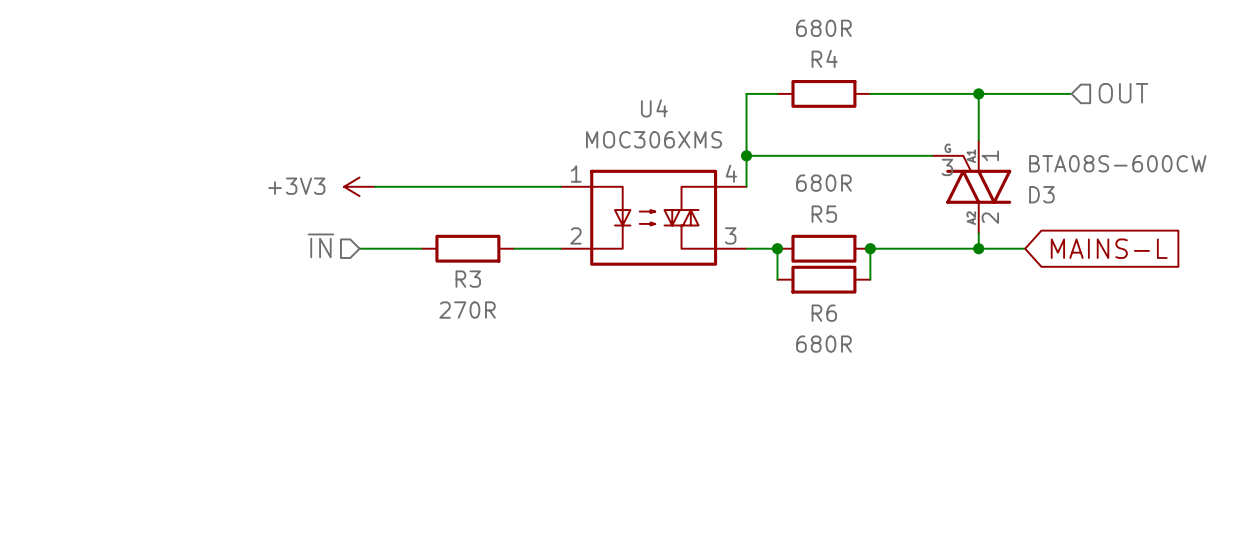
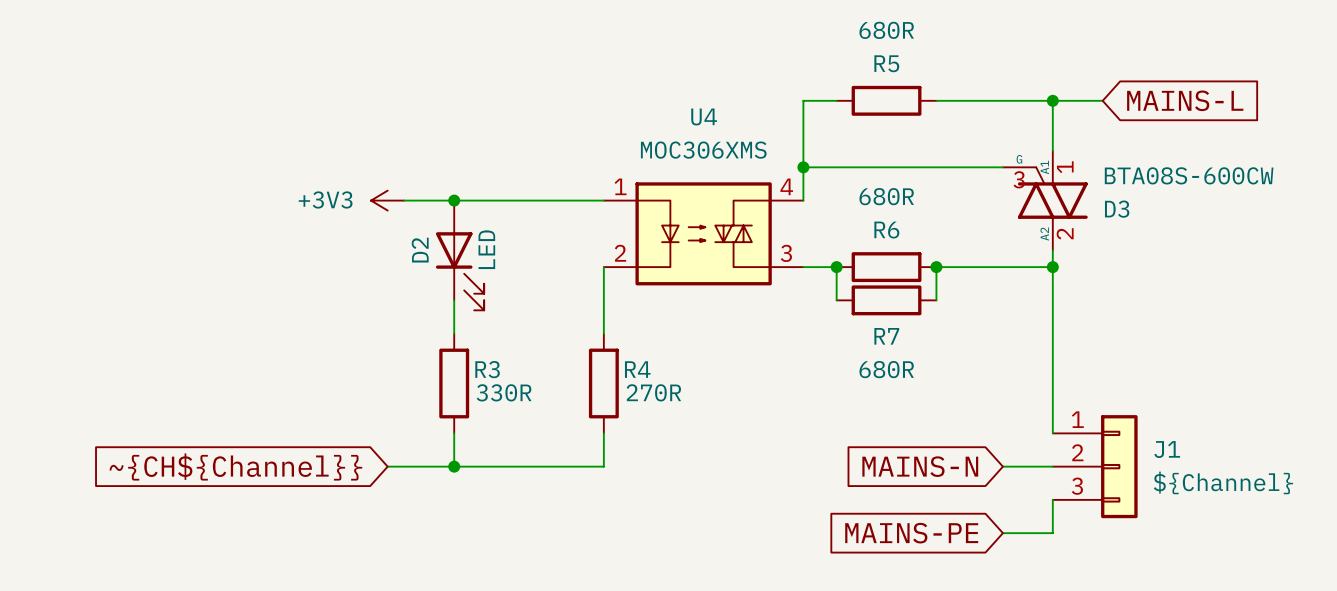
R4 name: R4 (824, 58) -> R5 (886, 63)
wire: (1025, 93) (1071, 93) -> none
hierarchical label: OUT (1123, 93) -> none
junction: none -> (454, 200)
R5 name: R5 (824, 214) -> R6 (886, 230)
D2: none -> LED (460, 255)
hierarchical label: ~{IN} (320, 245) -> none
wire: (359, 248) (421, 248) -> none
R3 rotation: 0° (467, 248) -> 90° clockwise (454, 383)
R3 position: (467, 248) -> (454, 383)
wire: (514, 248) (560, 248) -> (603, 333) (603, 267)
wire: (978, 248) (1025, 248) -> (1052, 267) (1052, 433)
global label position: MAINS-L (1109, 248) -> MAINS-L (1185, 100)
wire: none -> (454, 300) (454, 333)
R3 name position: R3 (468, 279) -> R3 (487, 369)
R3 value: 270R (467, 310) -> 330R (504, 392)
R6 name: R6 (824, 313) -> R7 (886, 336)
R4: none -> 270R (603, 383)
wire: none -> (454, 433) (454, 466)
wire: none -> (603, 433) (603, 466) (387, 466)
junction: none -> (454, 466)
global label: none -> MAINS-N (920, 466)
wire: none -> (1002, 466) (1052, 466)
J1: none -> ${Channel} (1095, 466)
global label: none -> ~{CH${Channel}} (235, 467)
wire: none -> (1052, 499) (1052, 533) (1002, 533)
global label: none -> MAINS-PE (911, 533)

